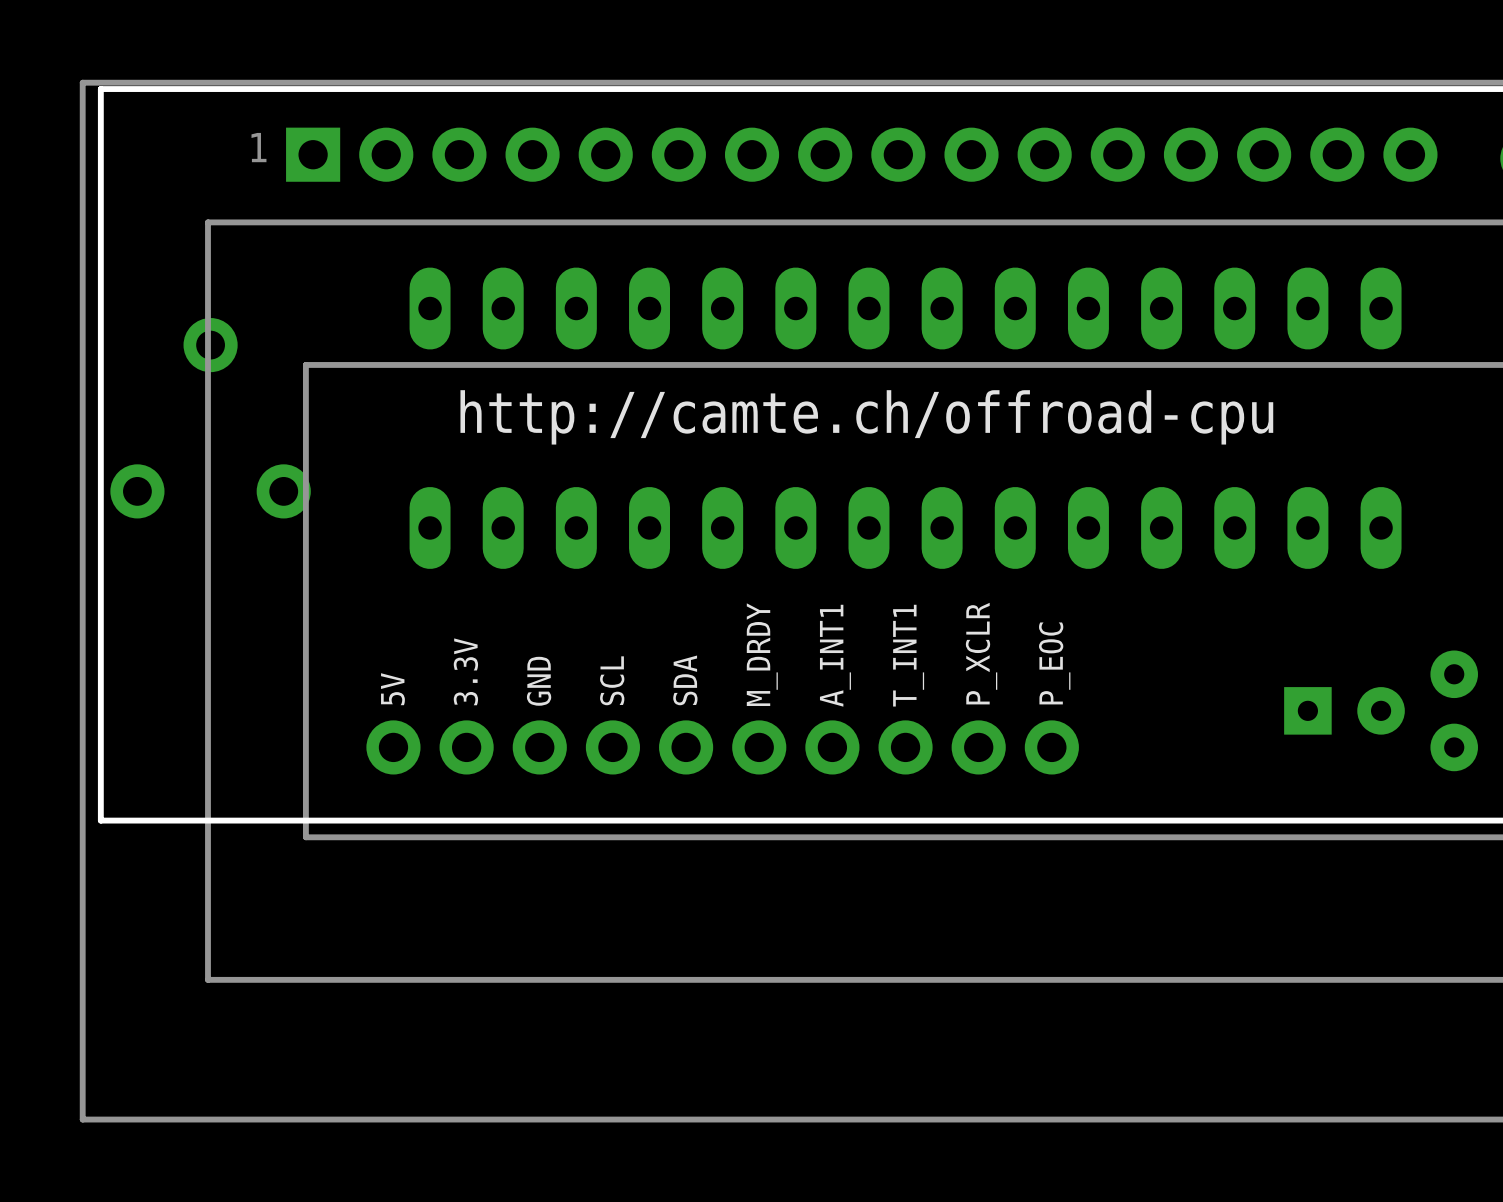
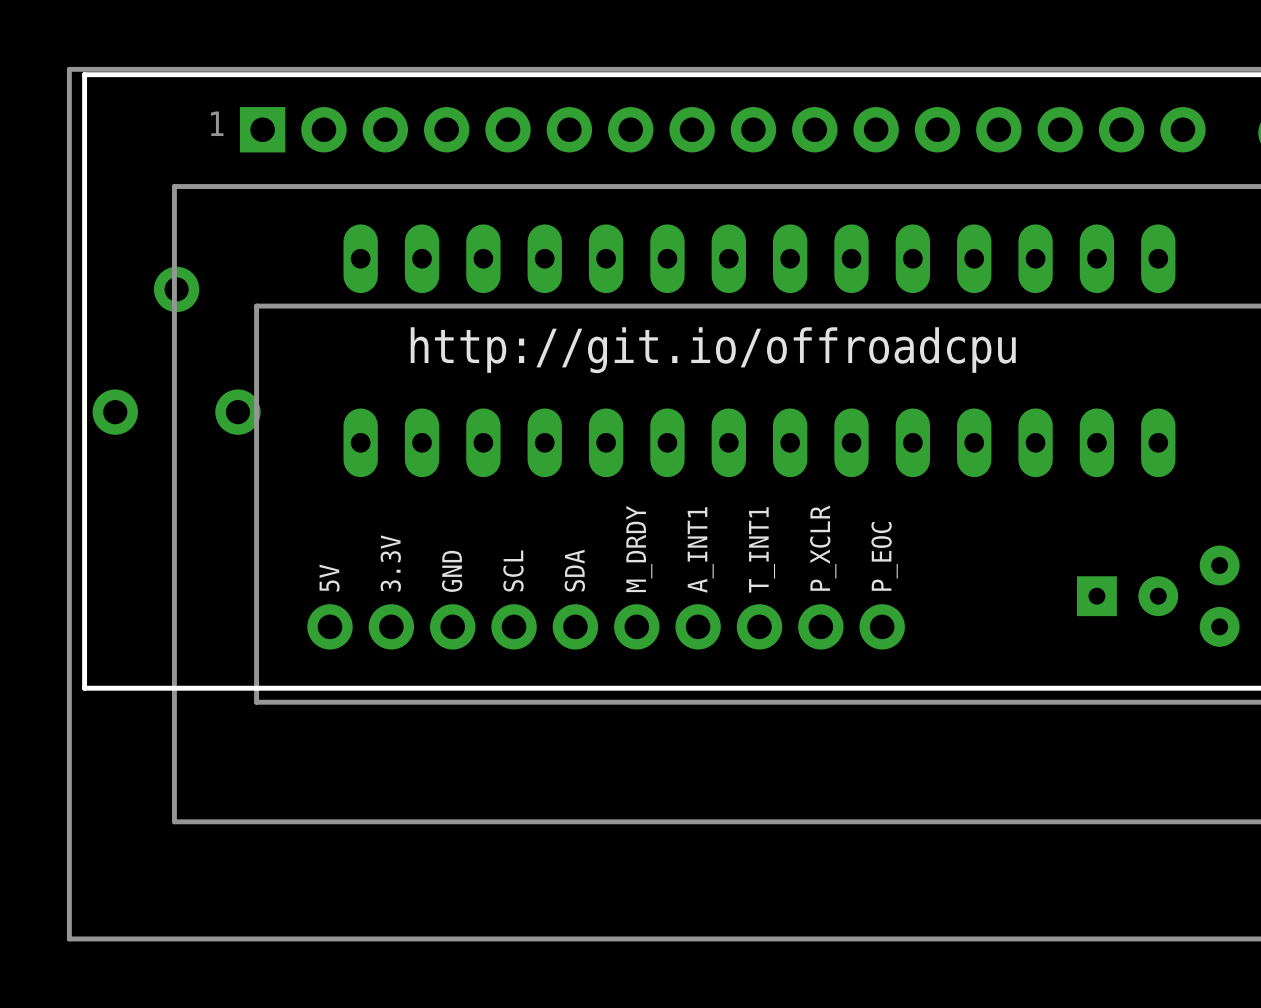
text: http://camte.ch/offroad-cpu (866, 417) -> http://git.io/offroadcpu (713, 350)

